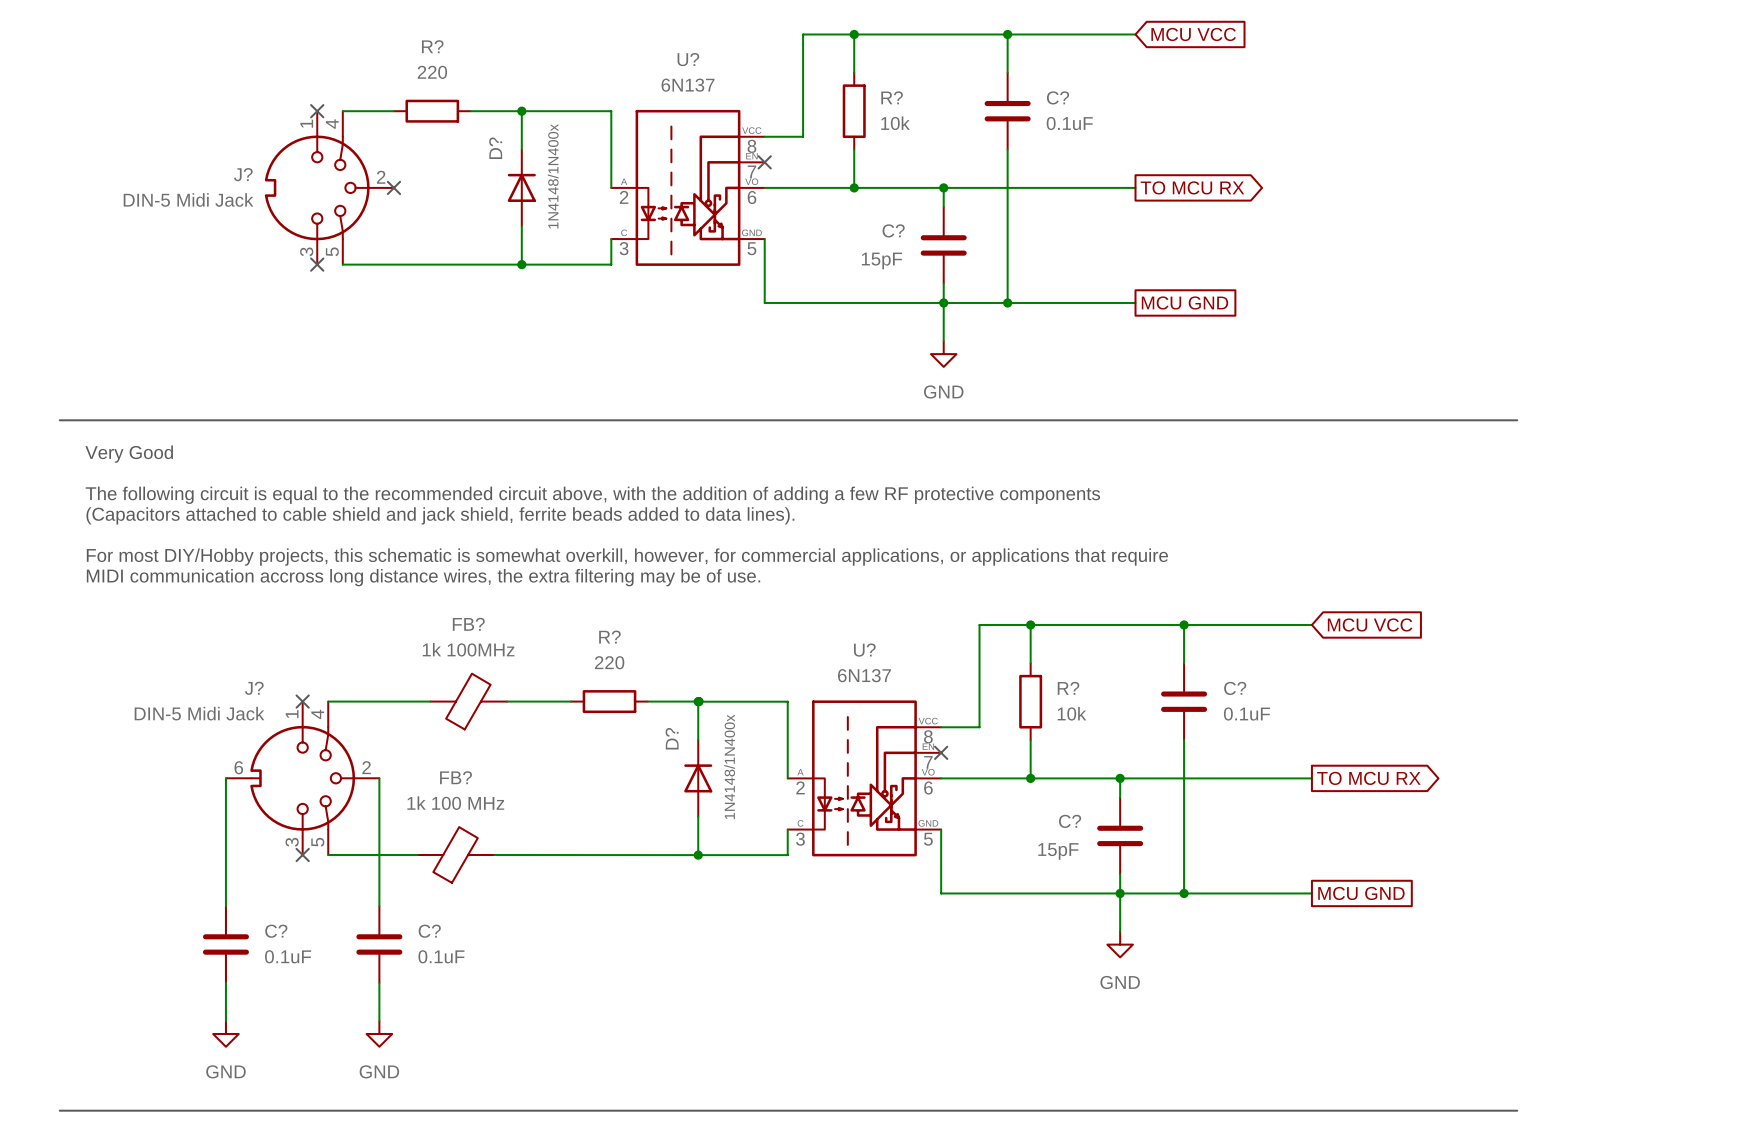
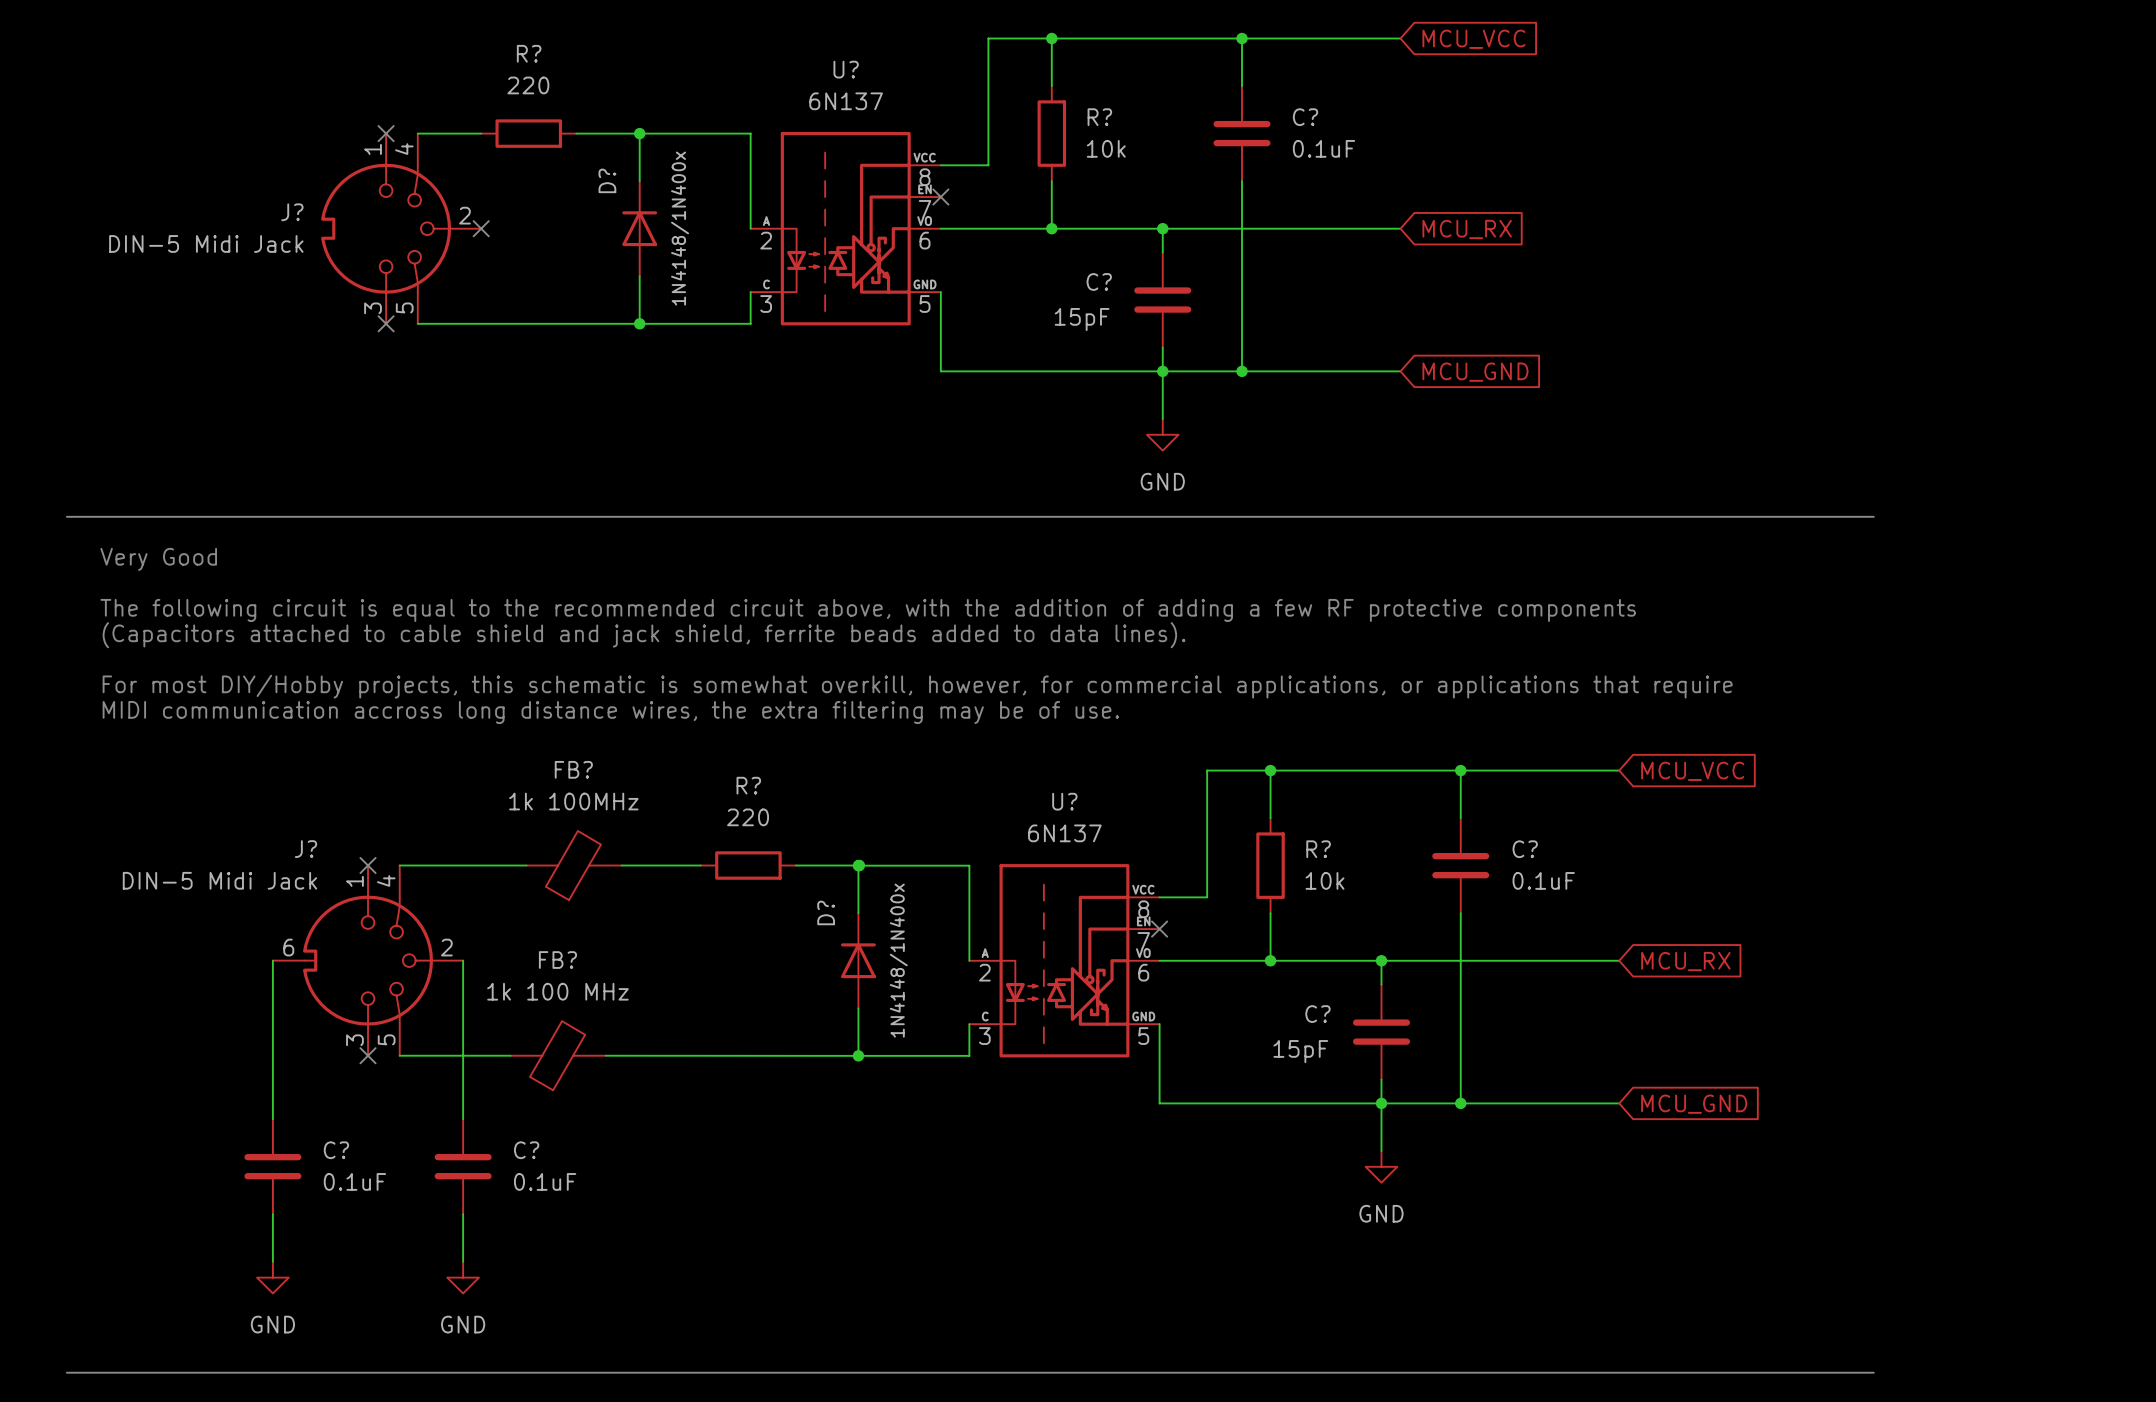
global label: MCU VCC (1193, 34) -> MCU_VCC (1473, 39)
global label shape: output (1192, 187) -> input (1467, 229)
global label: TO MCU RX (1192, 187) -> MCU_RX (1467, 229)
global label shape: passive (1185, 302) -> input (1475, 372)
global label: MCU GND (1185, 302) -> MCU_GND (1475, 372)
global label: MCU VCC (1370, 624) -> MCU_VCC (1692, 771)
global label shape: output (1368, 778) -> input (1685, 961)
global label: TO MCU RX (1368, 778) -> MCU_RX (1685, 961)
global label shape: passive (1361, 893) -> input (1694, 1104)
global label: MCU GND (1361, 893) -> MCU_GND (1694, 1104)

